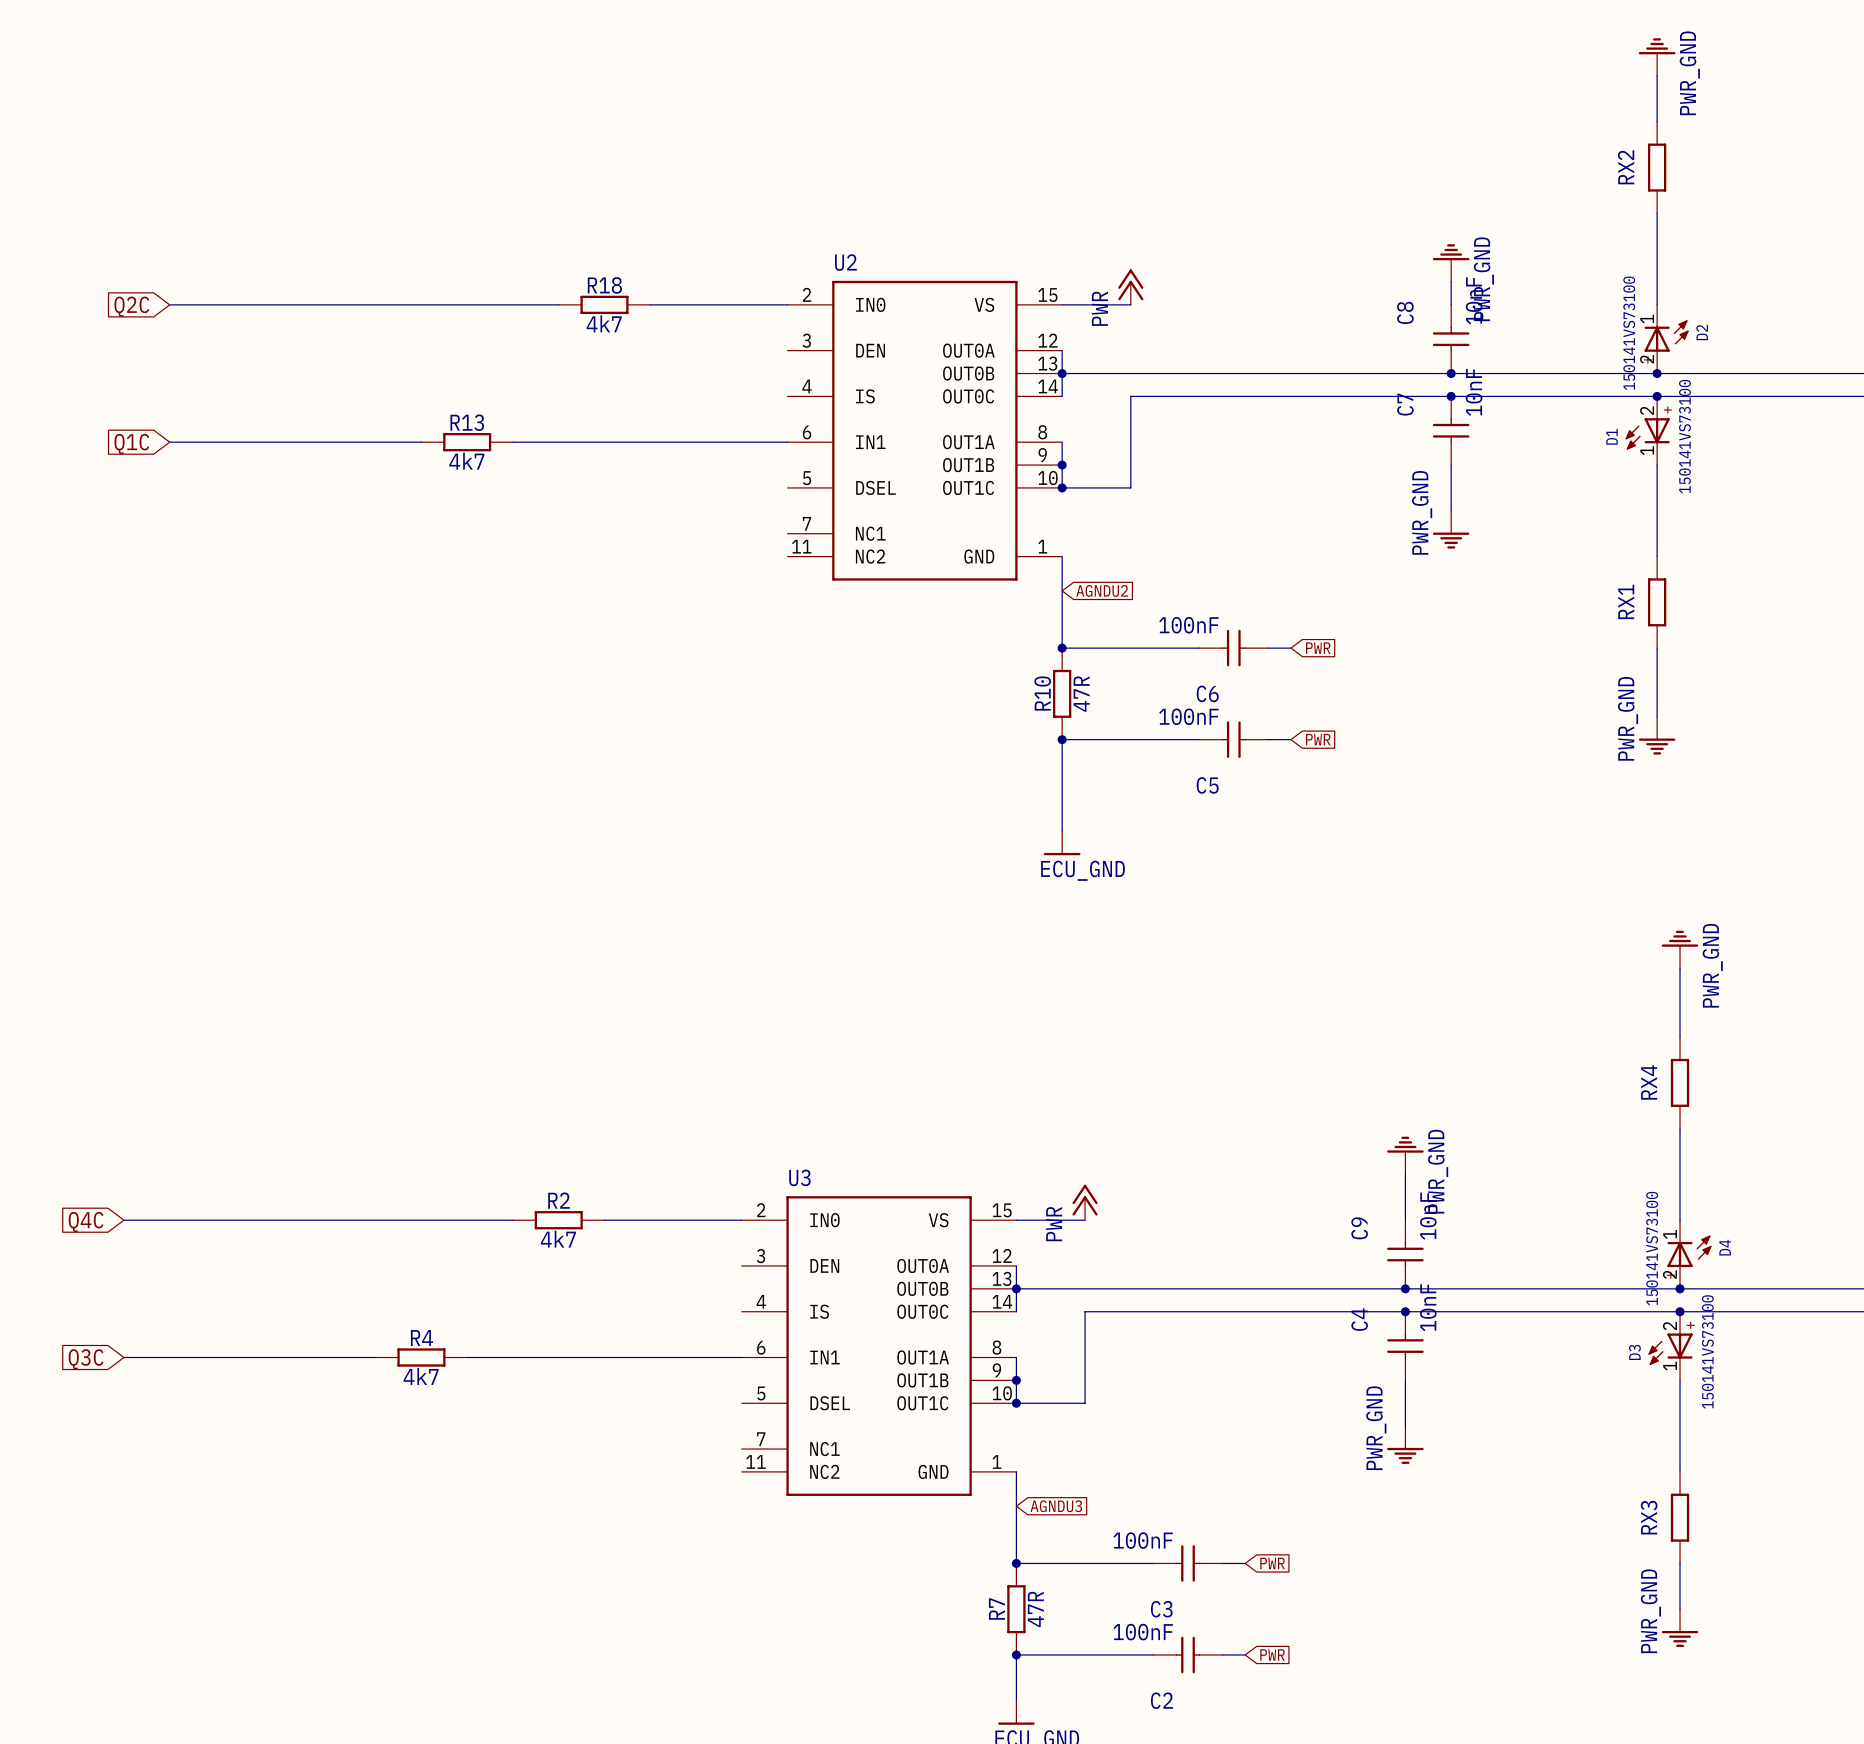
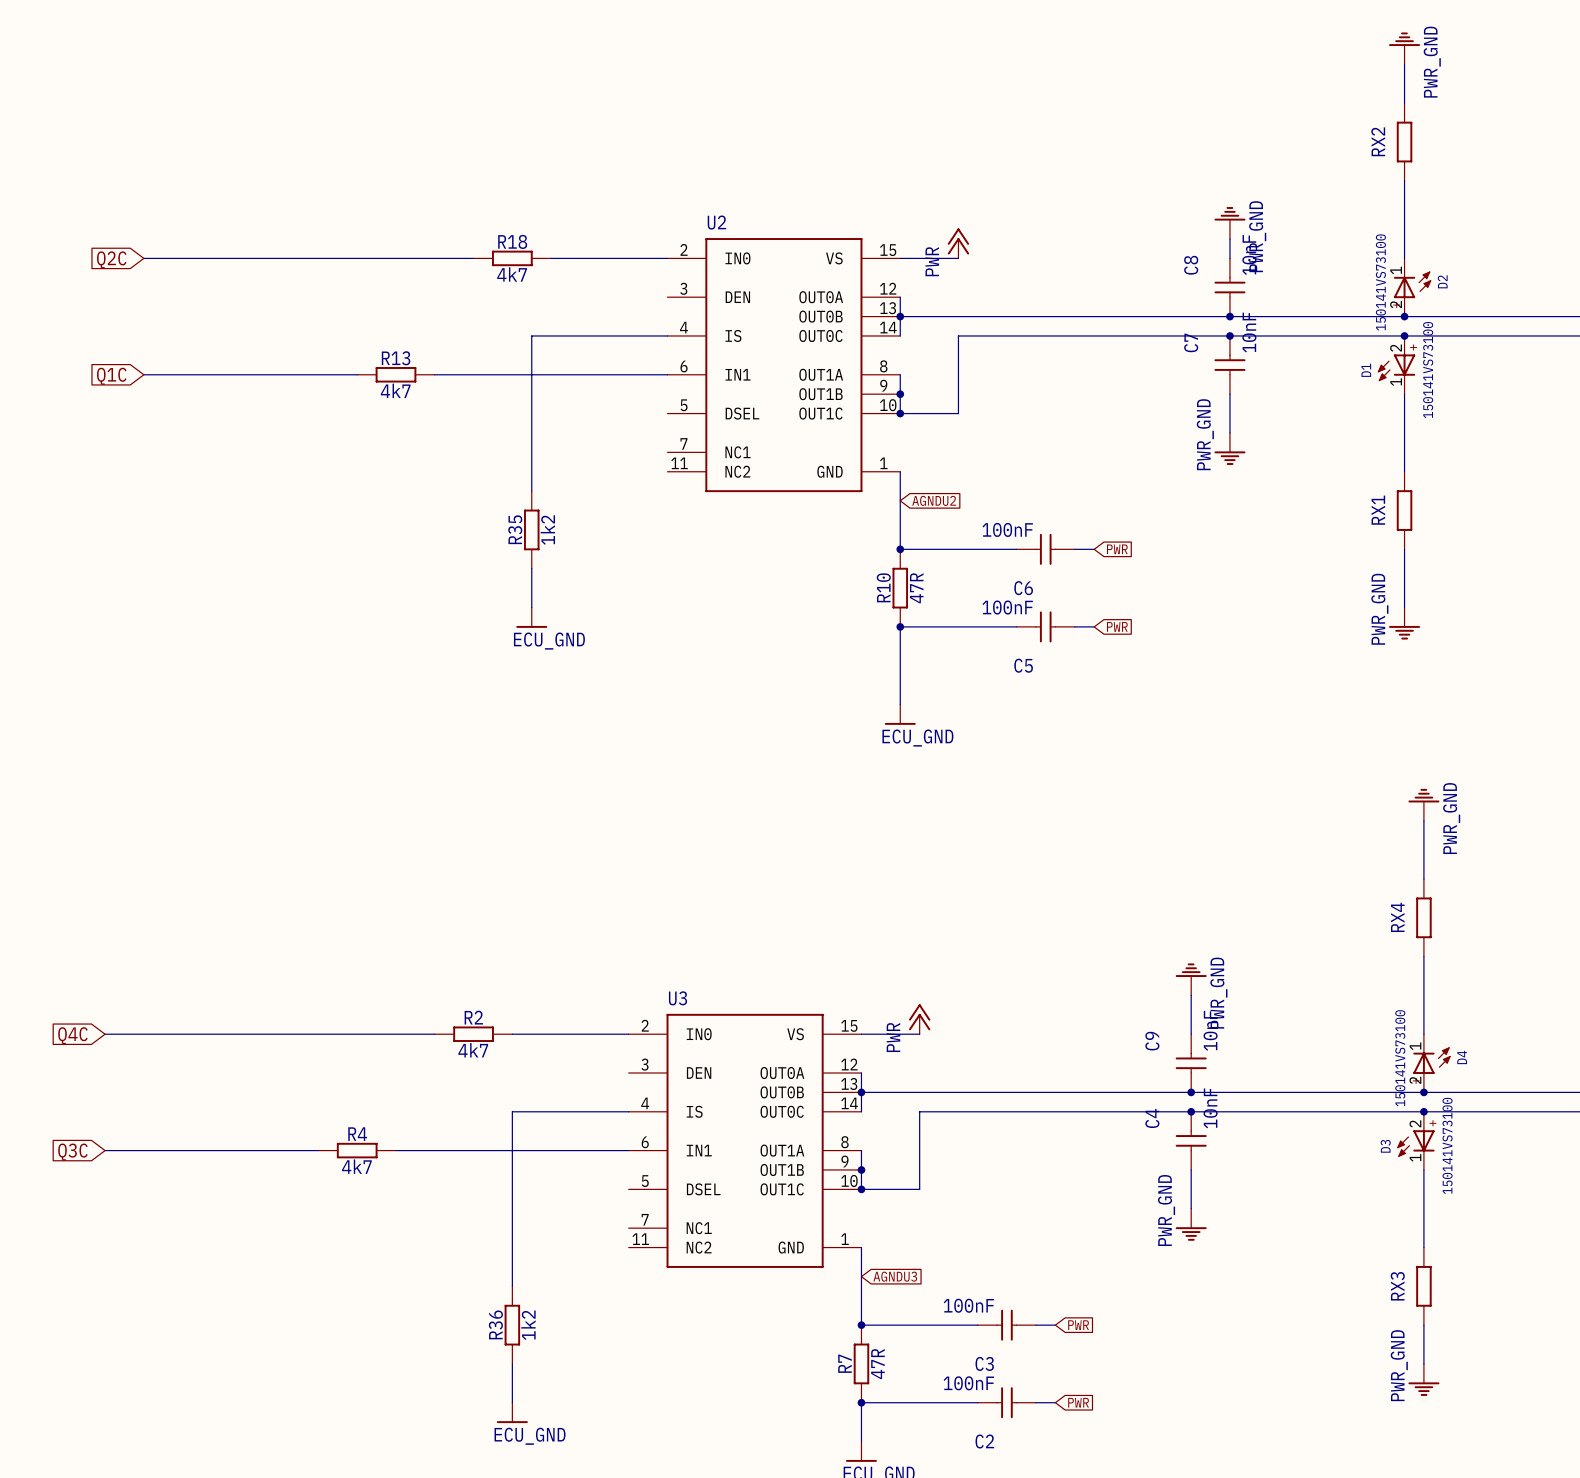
wire: none -> (667, 335) (531, 335) (531, 491)
R35: none -> 1k2 (531, 529)
wire: none -> (531, 568) (531, 607)
power symbol: none -> ECU_GND (531, 617)
wire: none -> (628, 1111) (512, 1111) (512, 1286)
R36: none -> 1k2 (512, 1325)
wire: none -> (512, 1363) (512, 1402)
power symbol: none -> ECU_GND (512, 1412)

